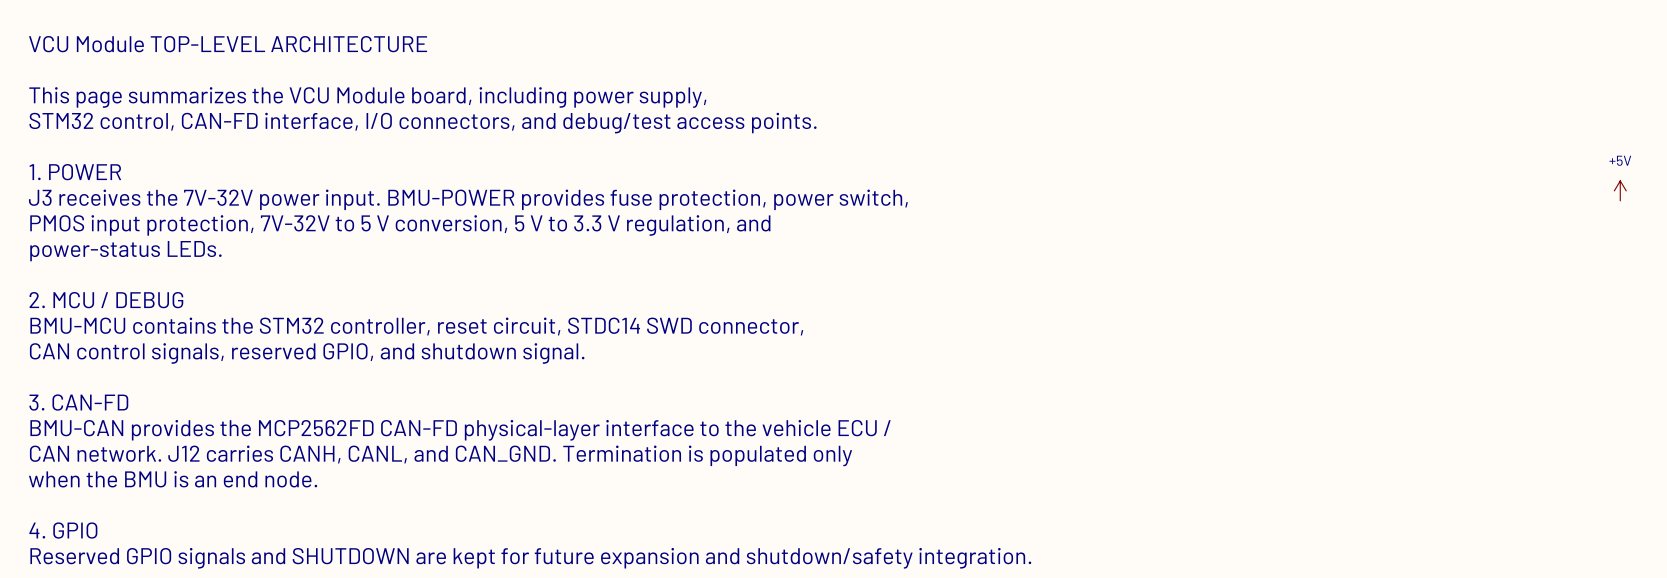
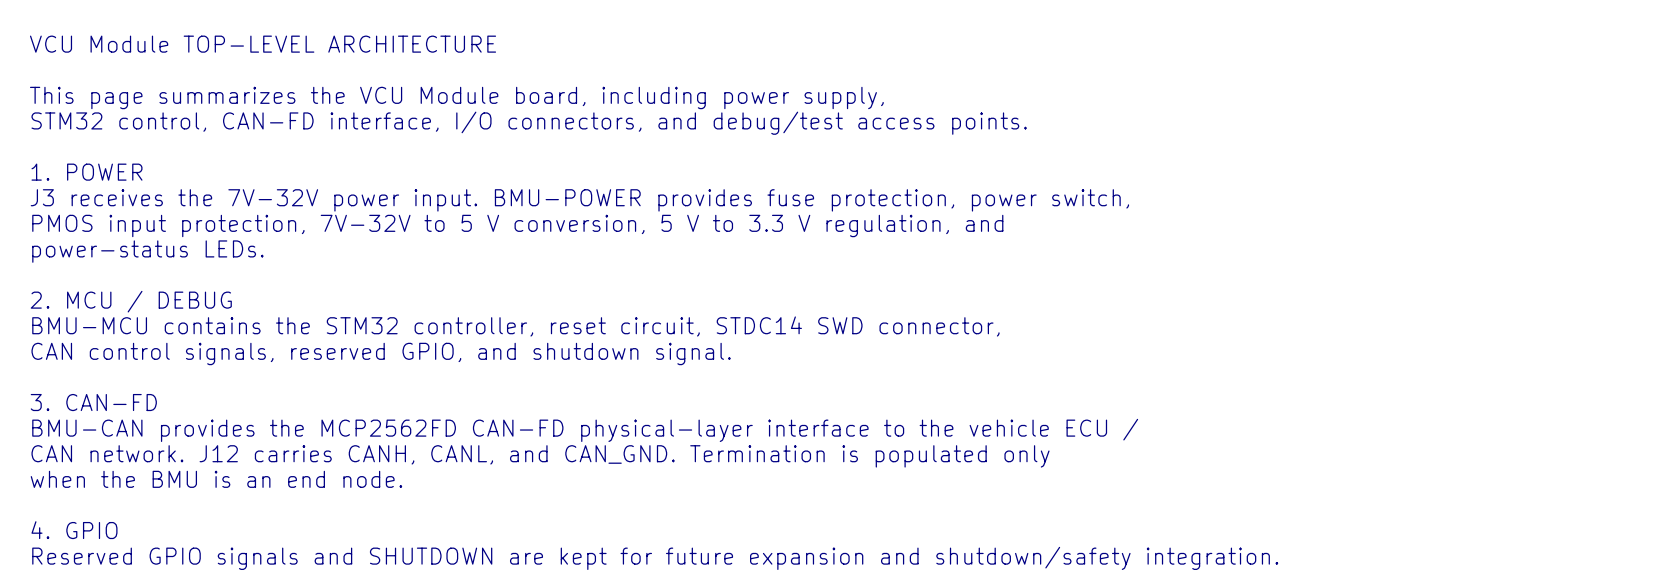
power symbol: +5V (1620, 190) -> none

